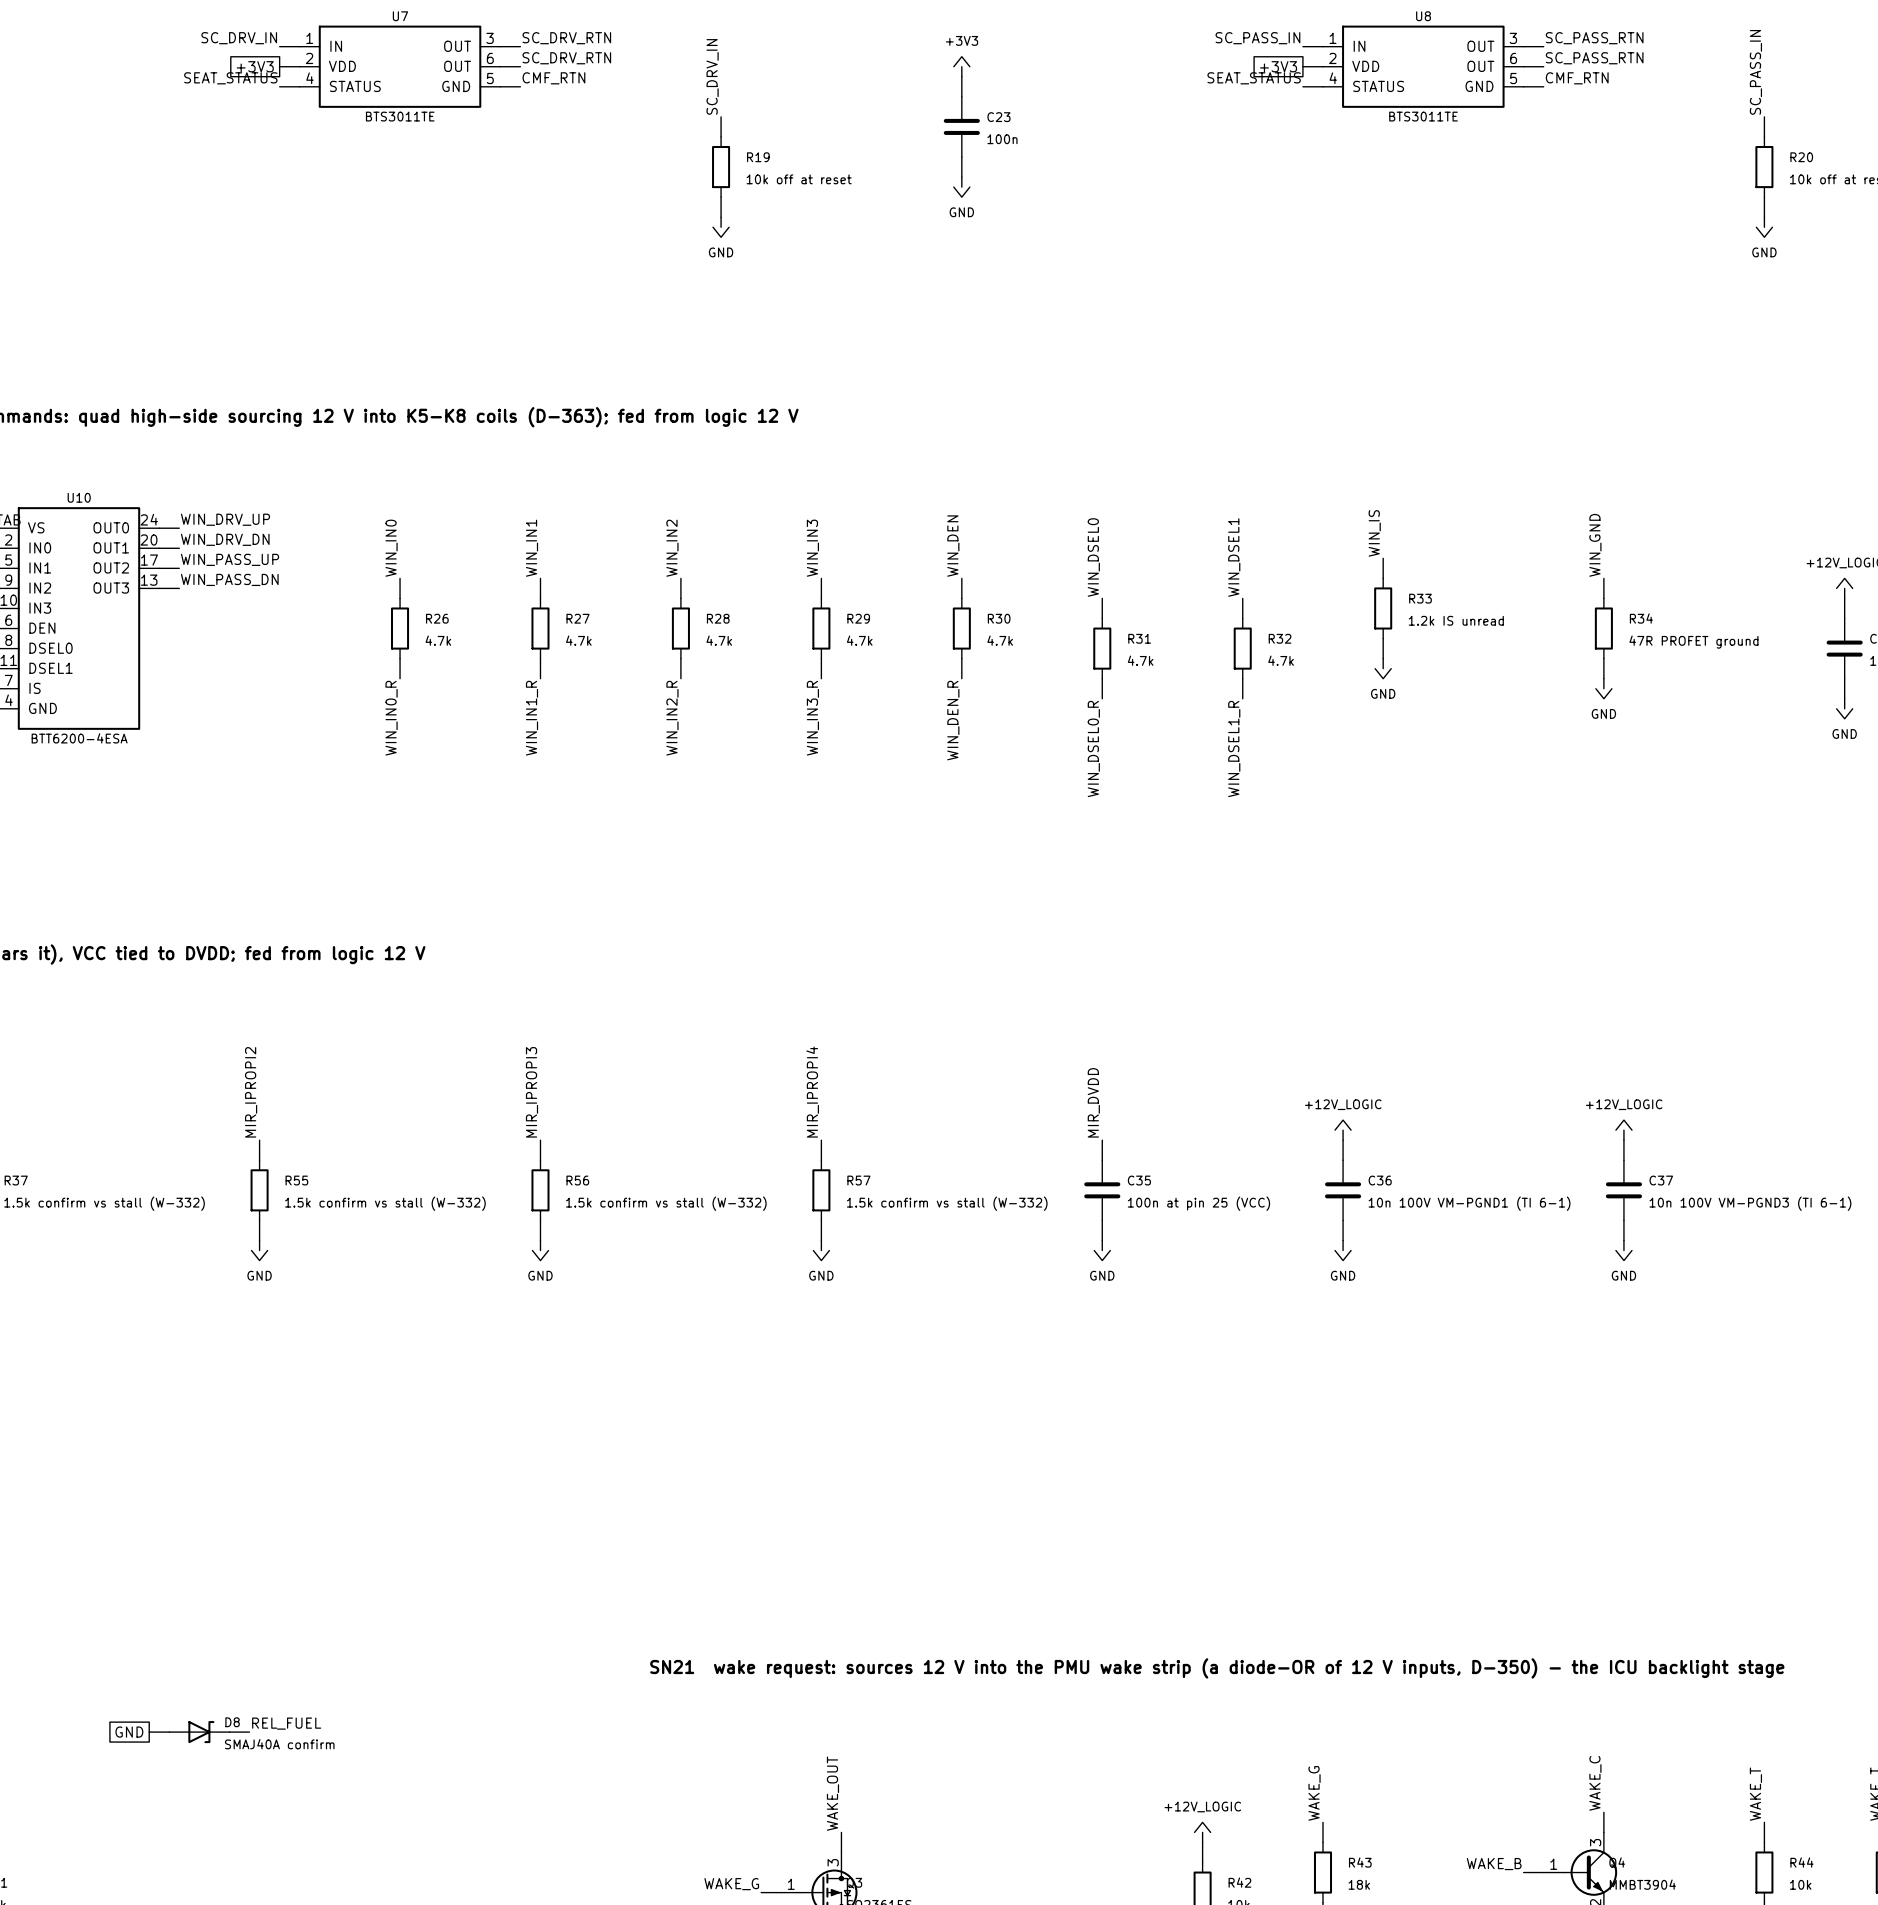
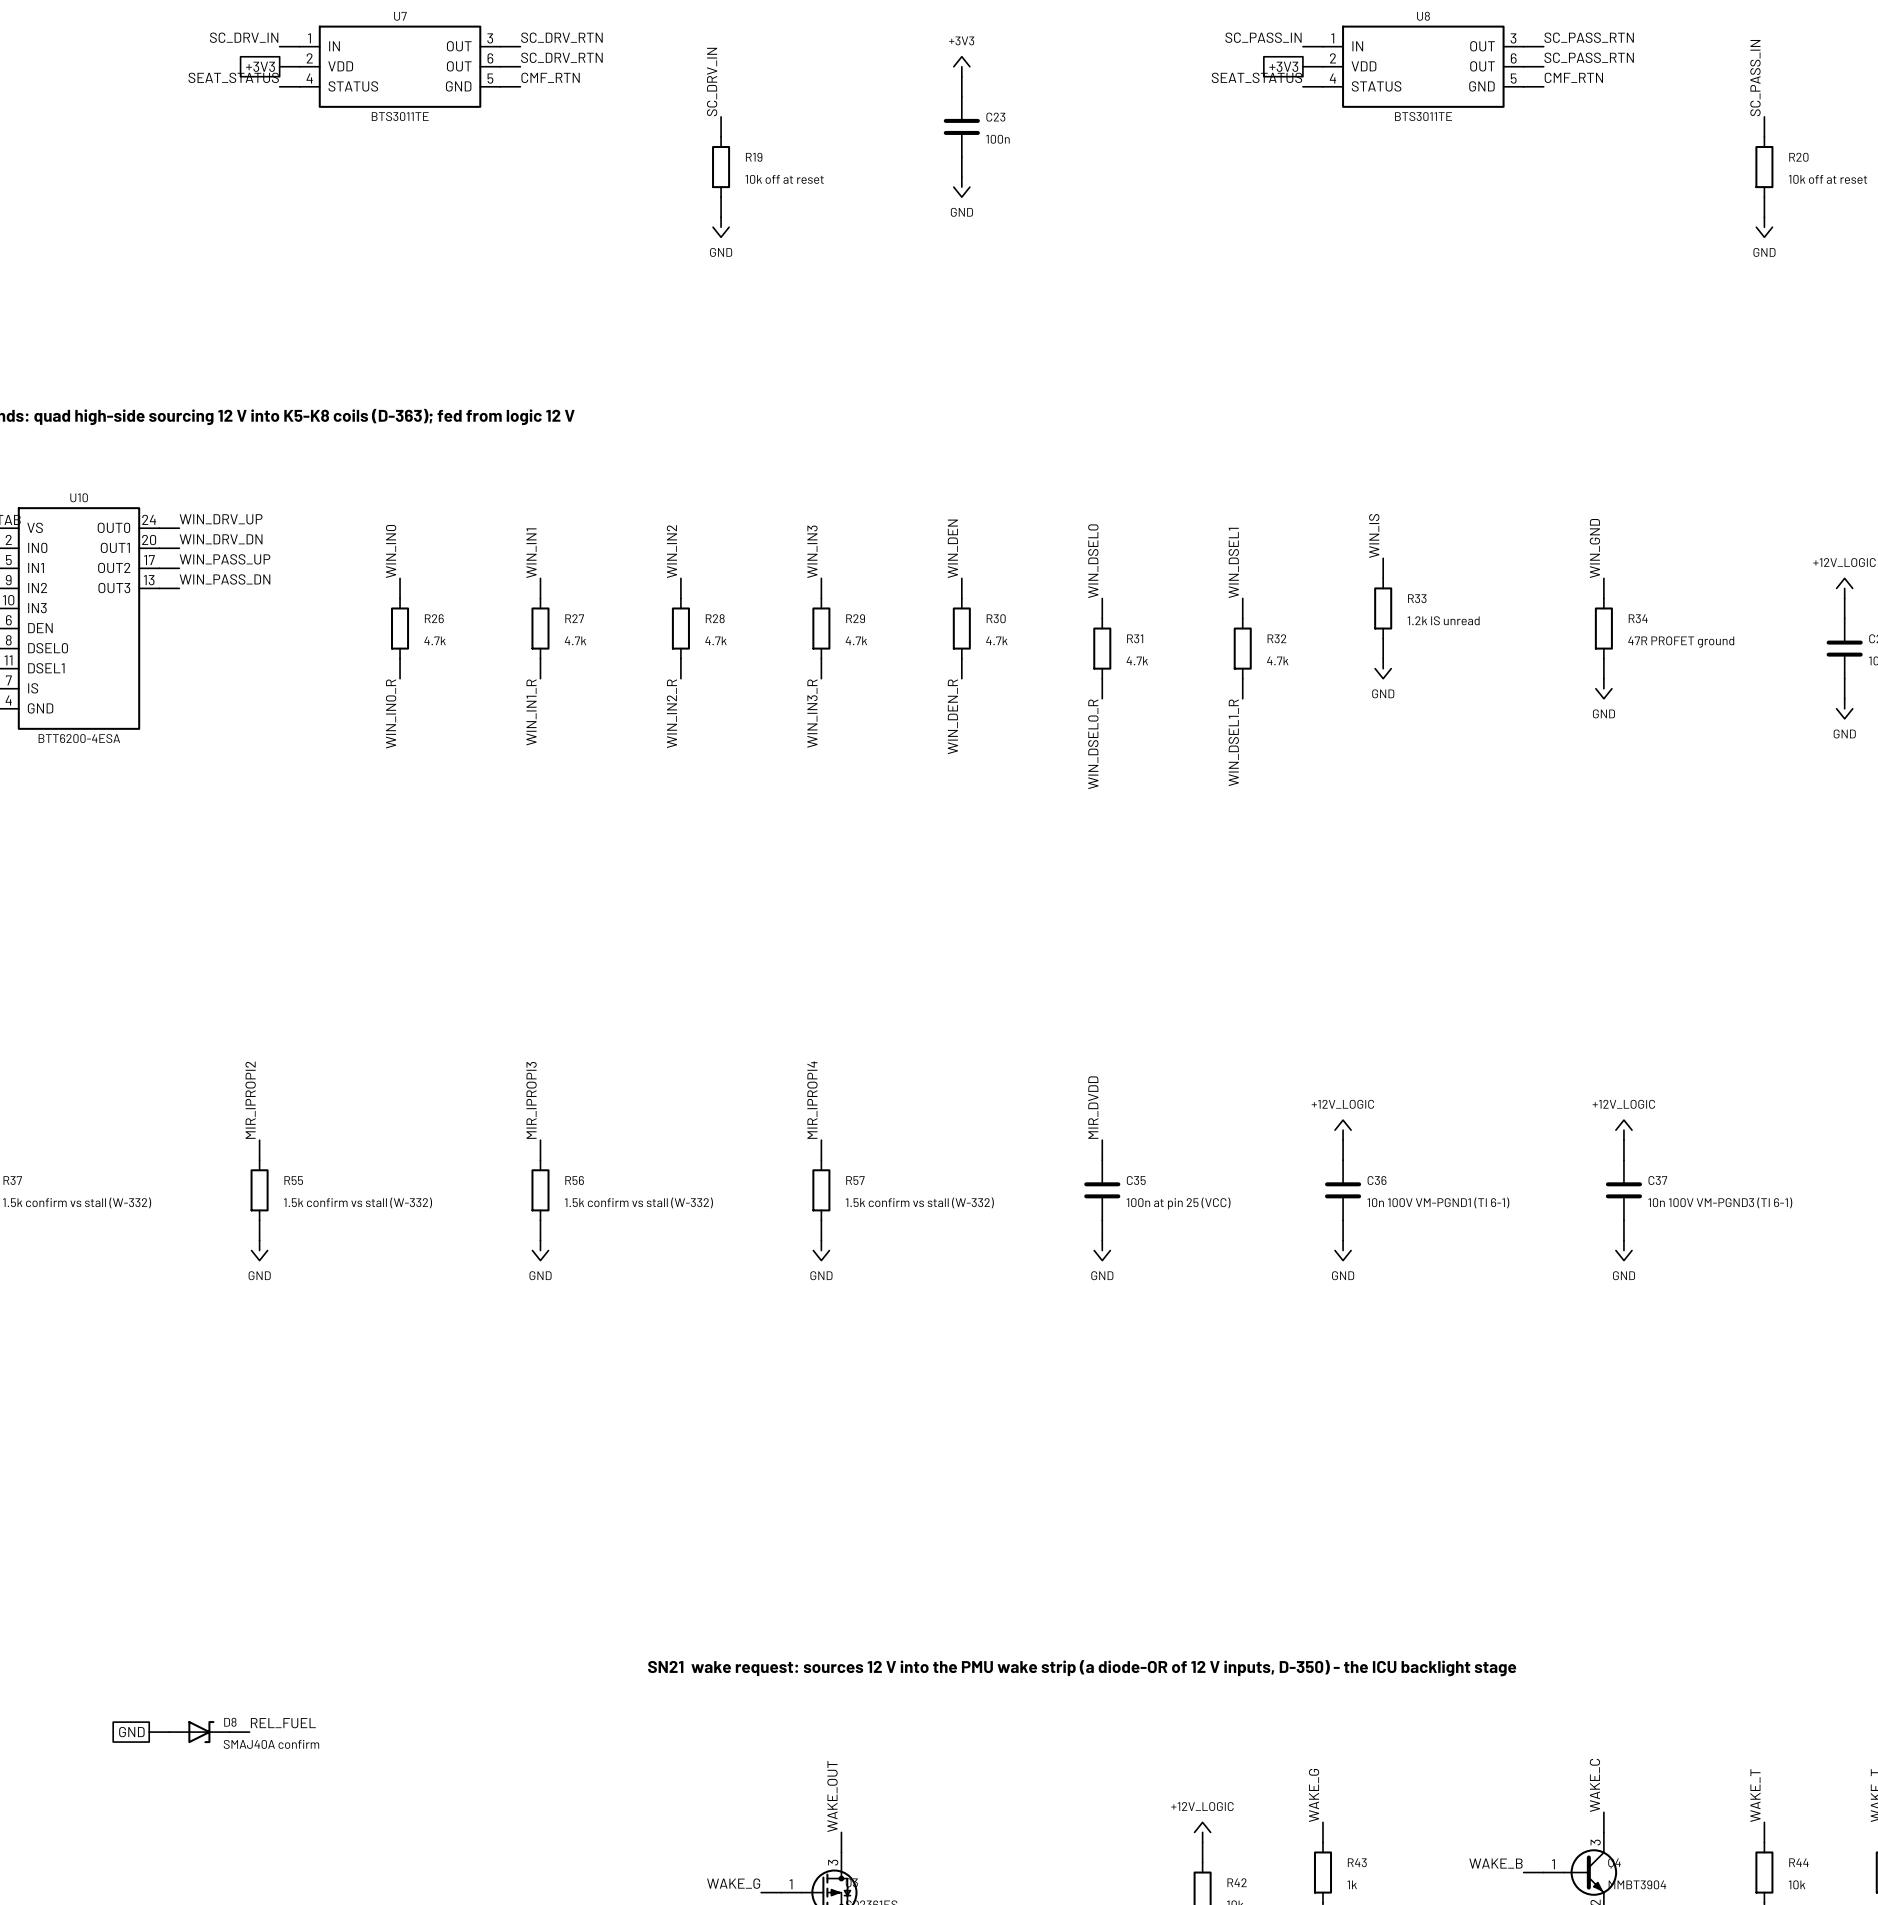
R43 value: 18k (1359, 1884) -> 1k (1352, 1884)

